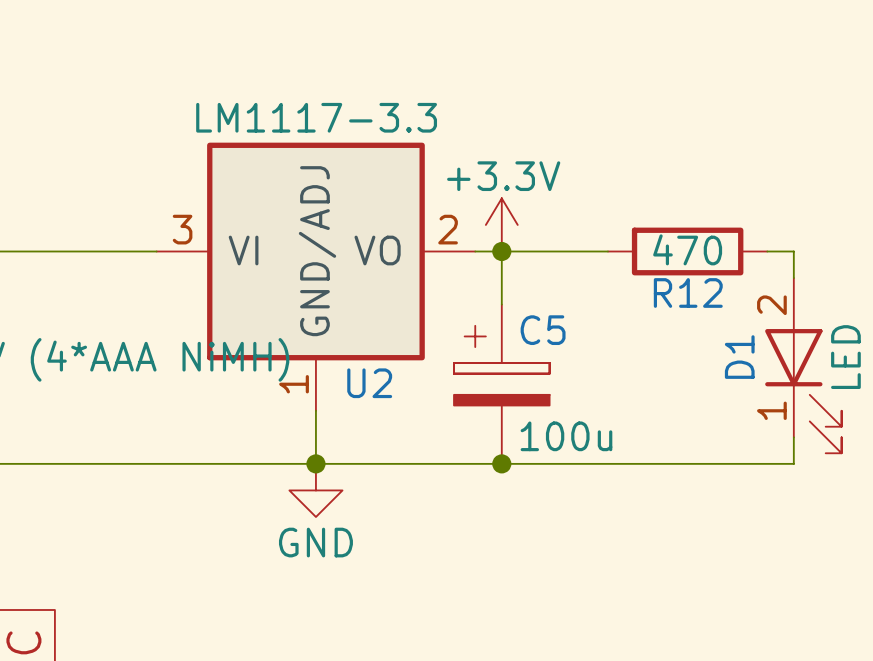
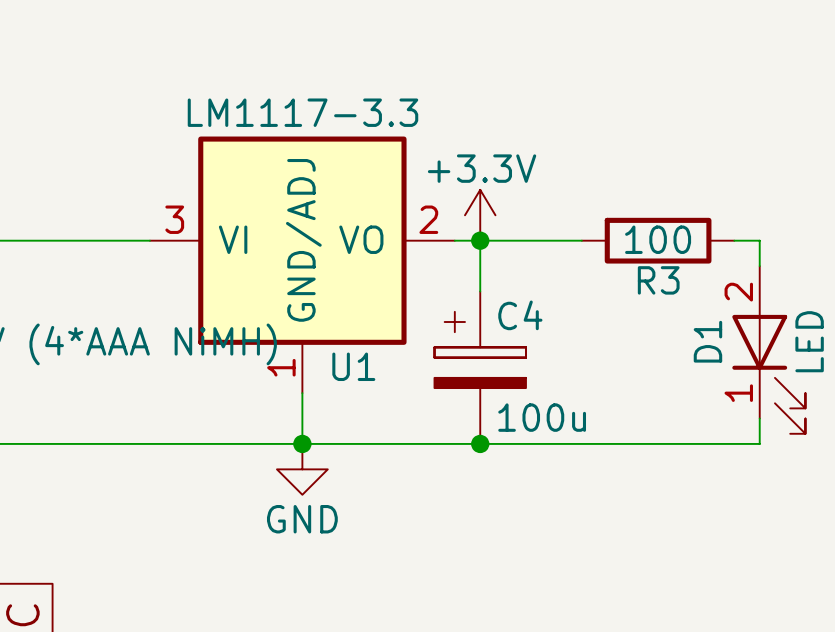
R12 value: 470 (687, 249) -> 100 (658, 239)
R12 name: R12 (688, 292) -> R3 (658, 280)
C5 name: C5 (543, 330) -> C4 (520, 315)
U2 name: U2 (369, 383) -> U1 (353, 366)

